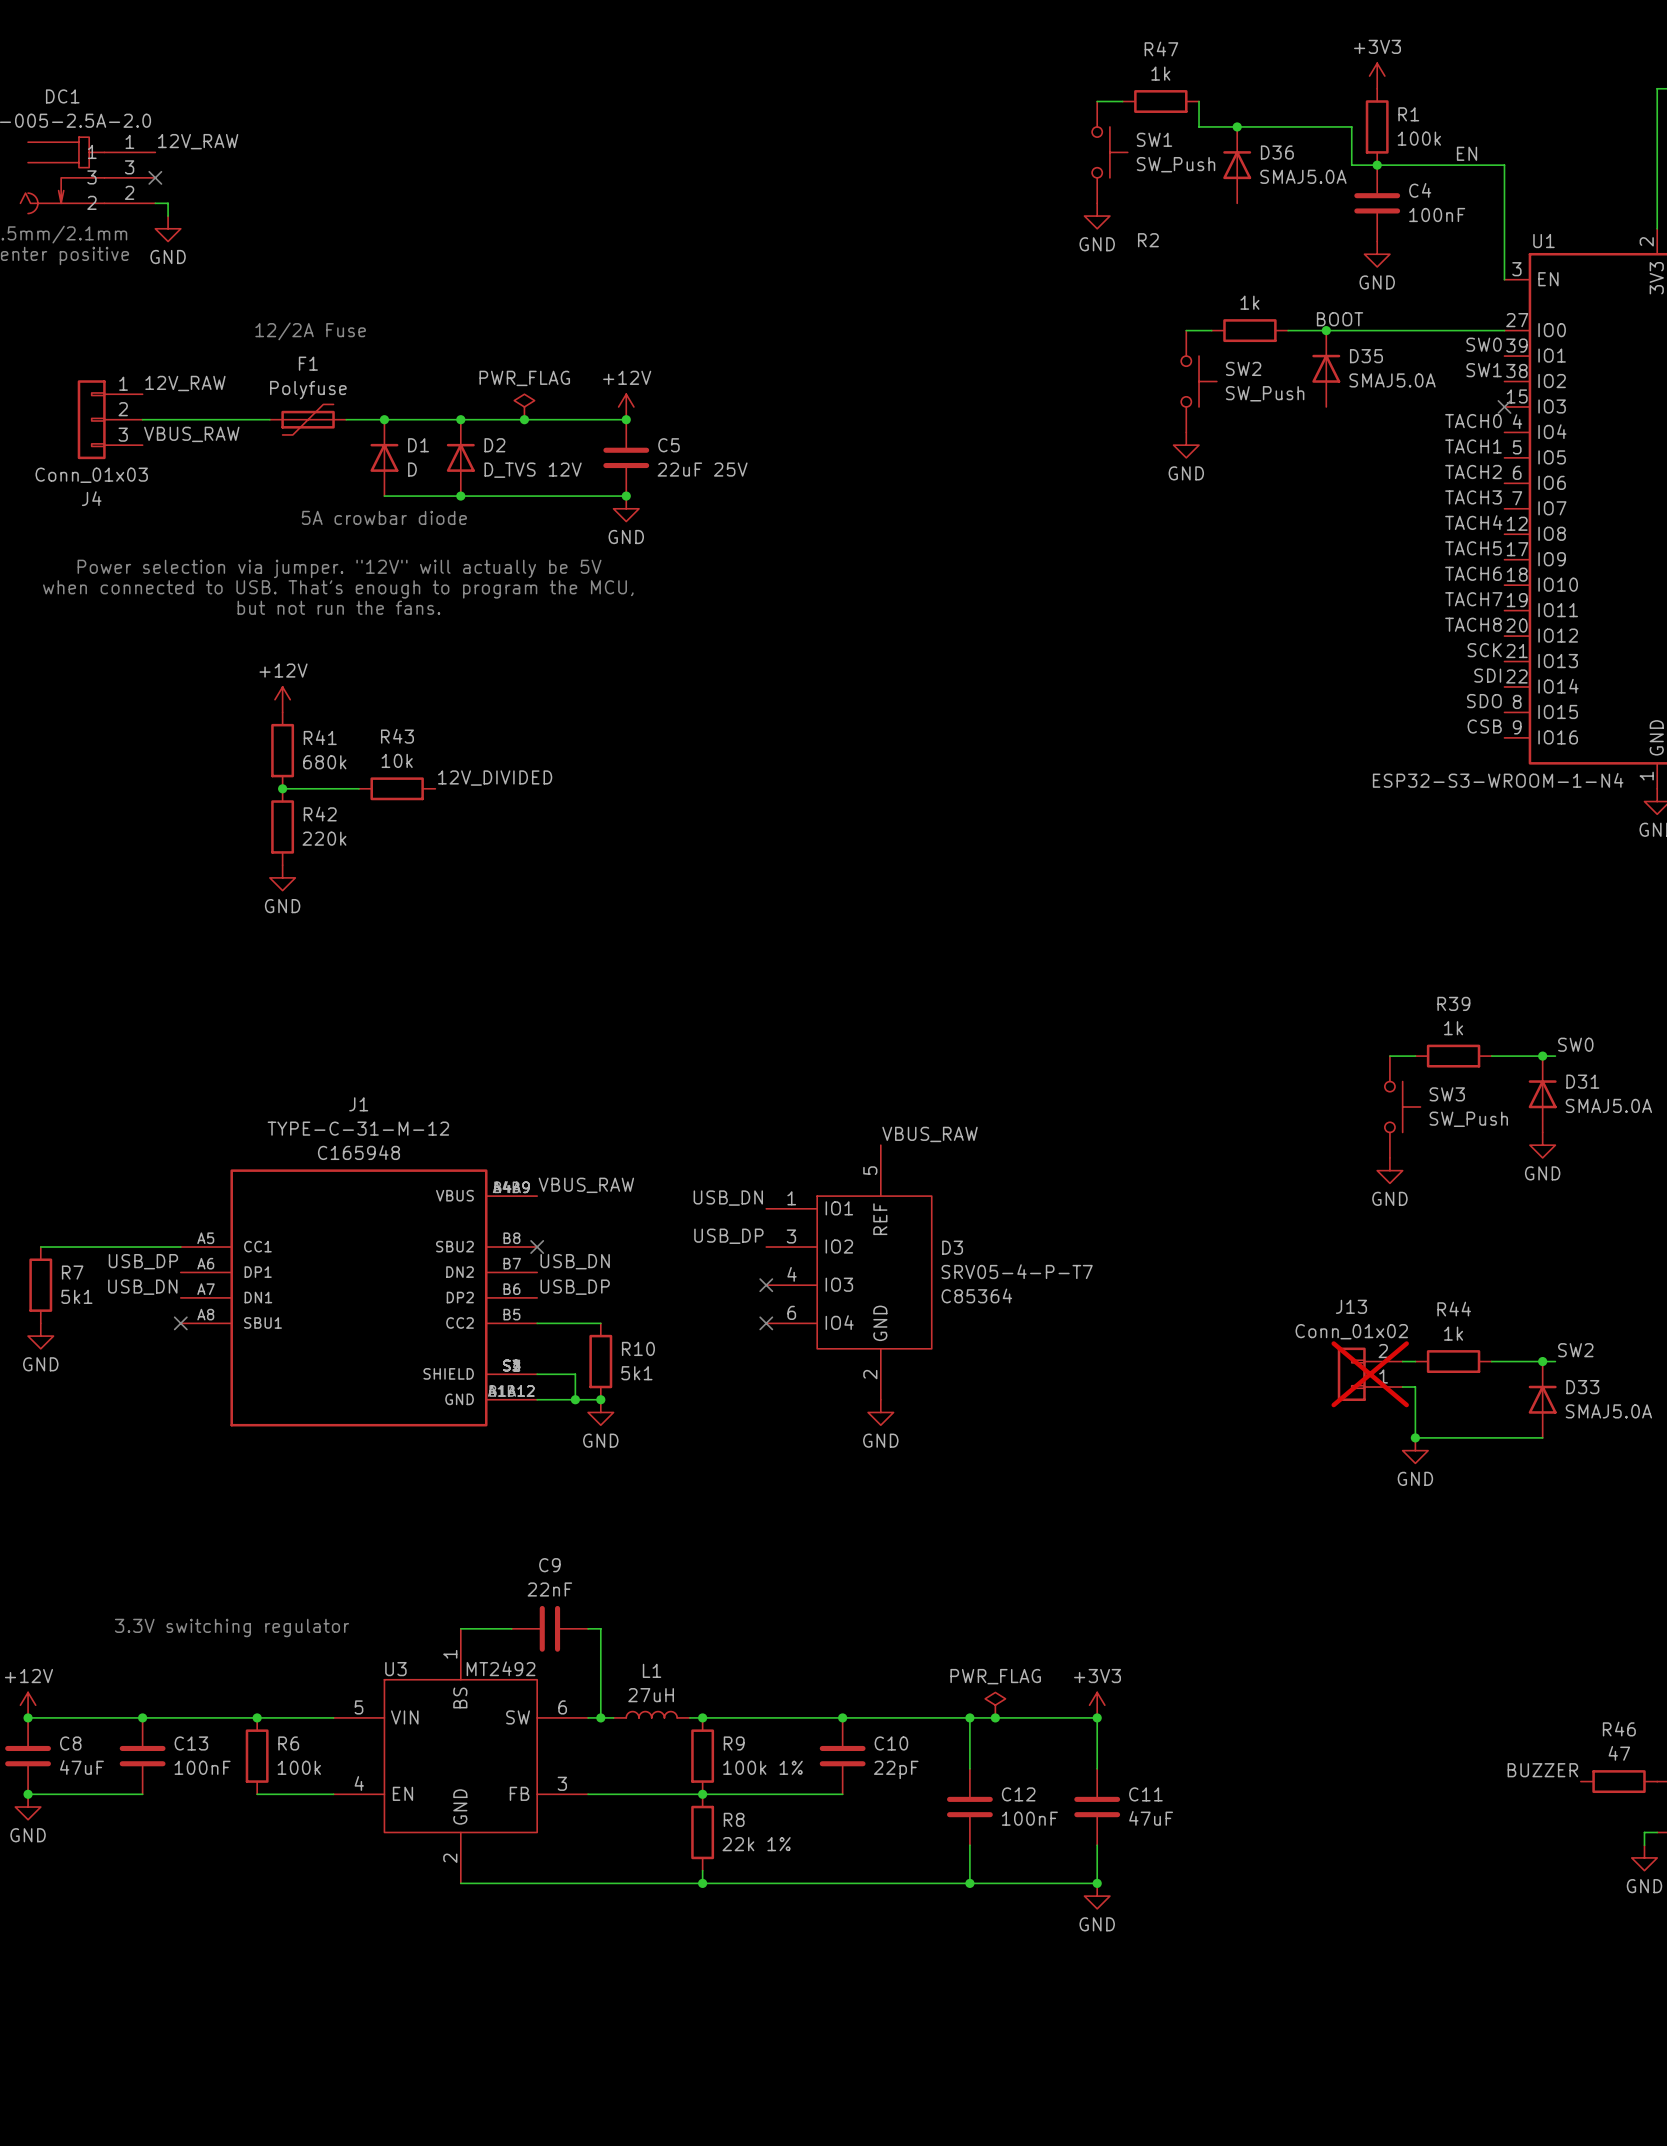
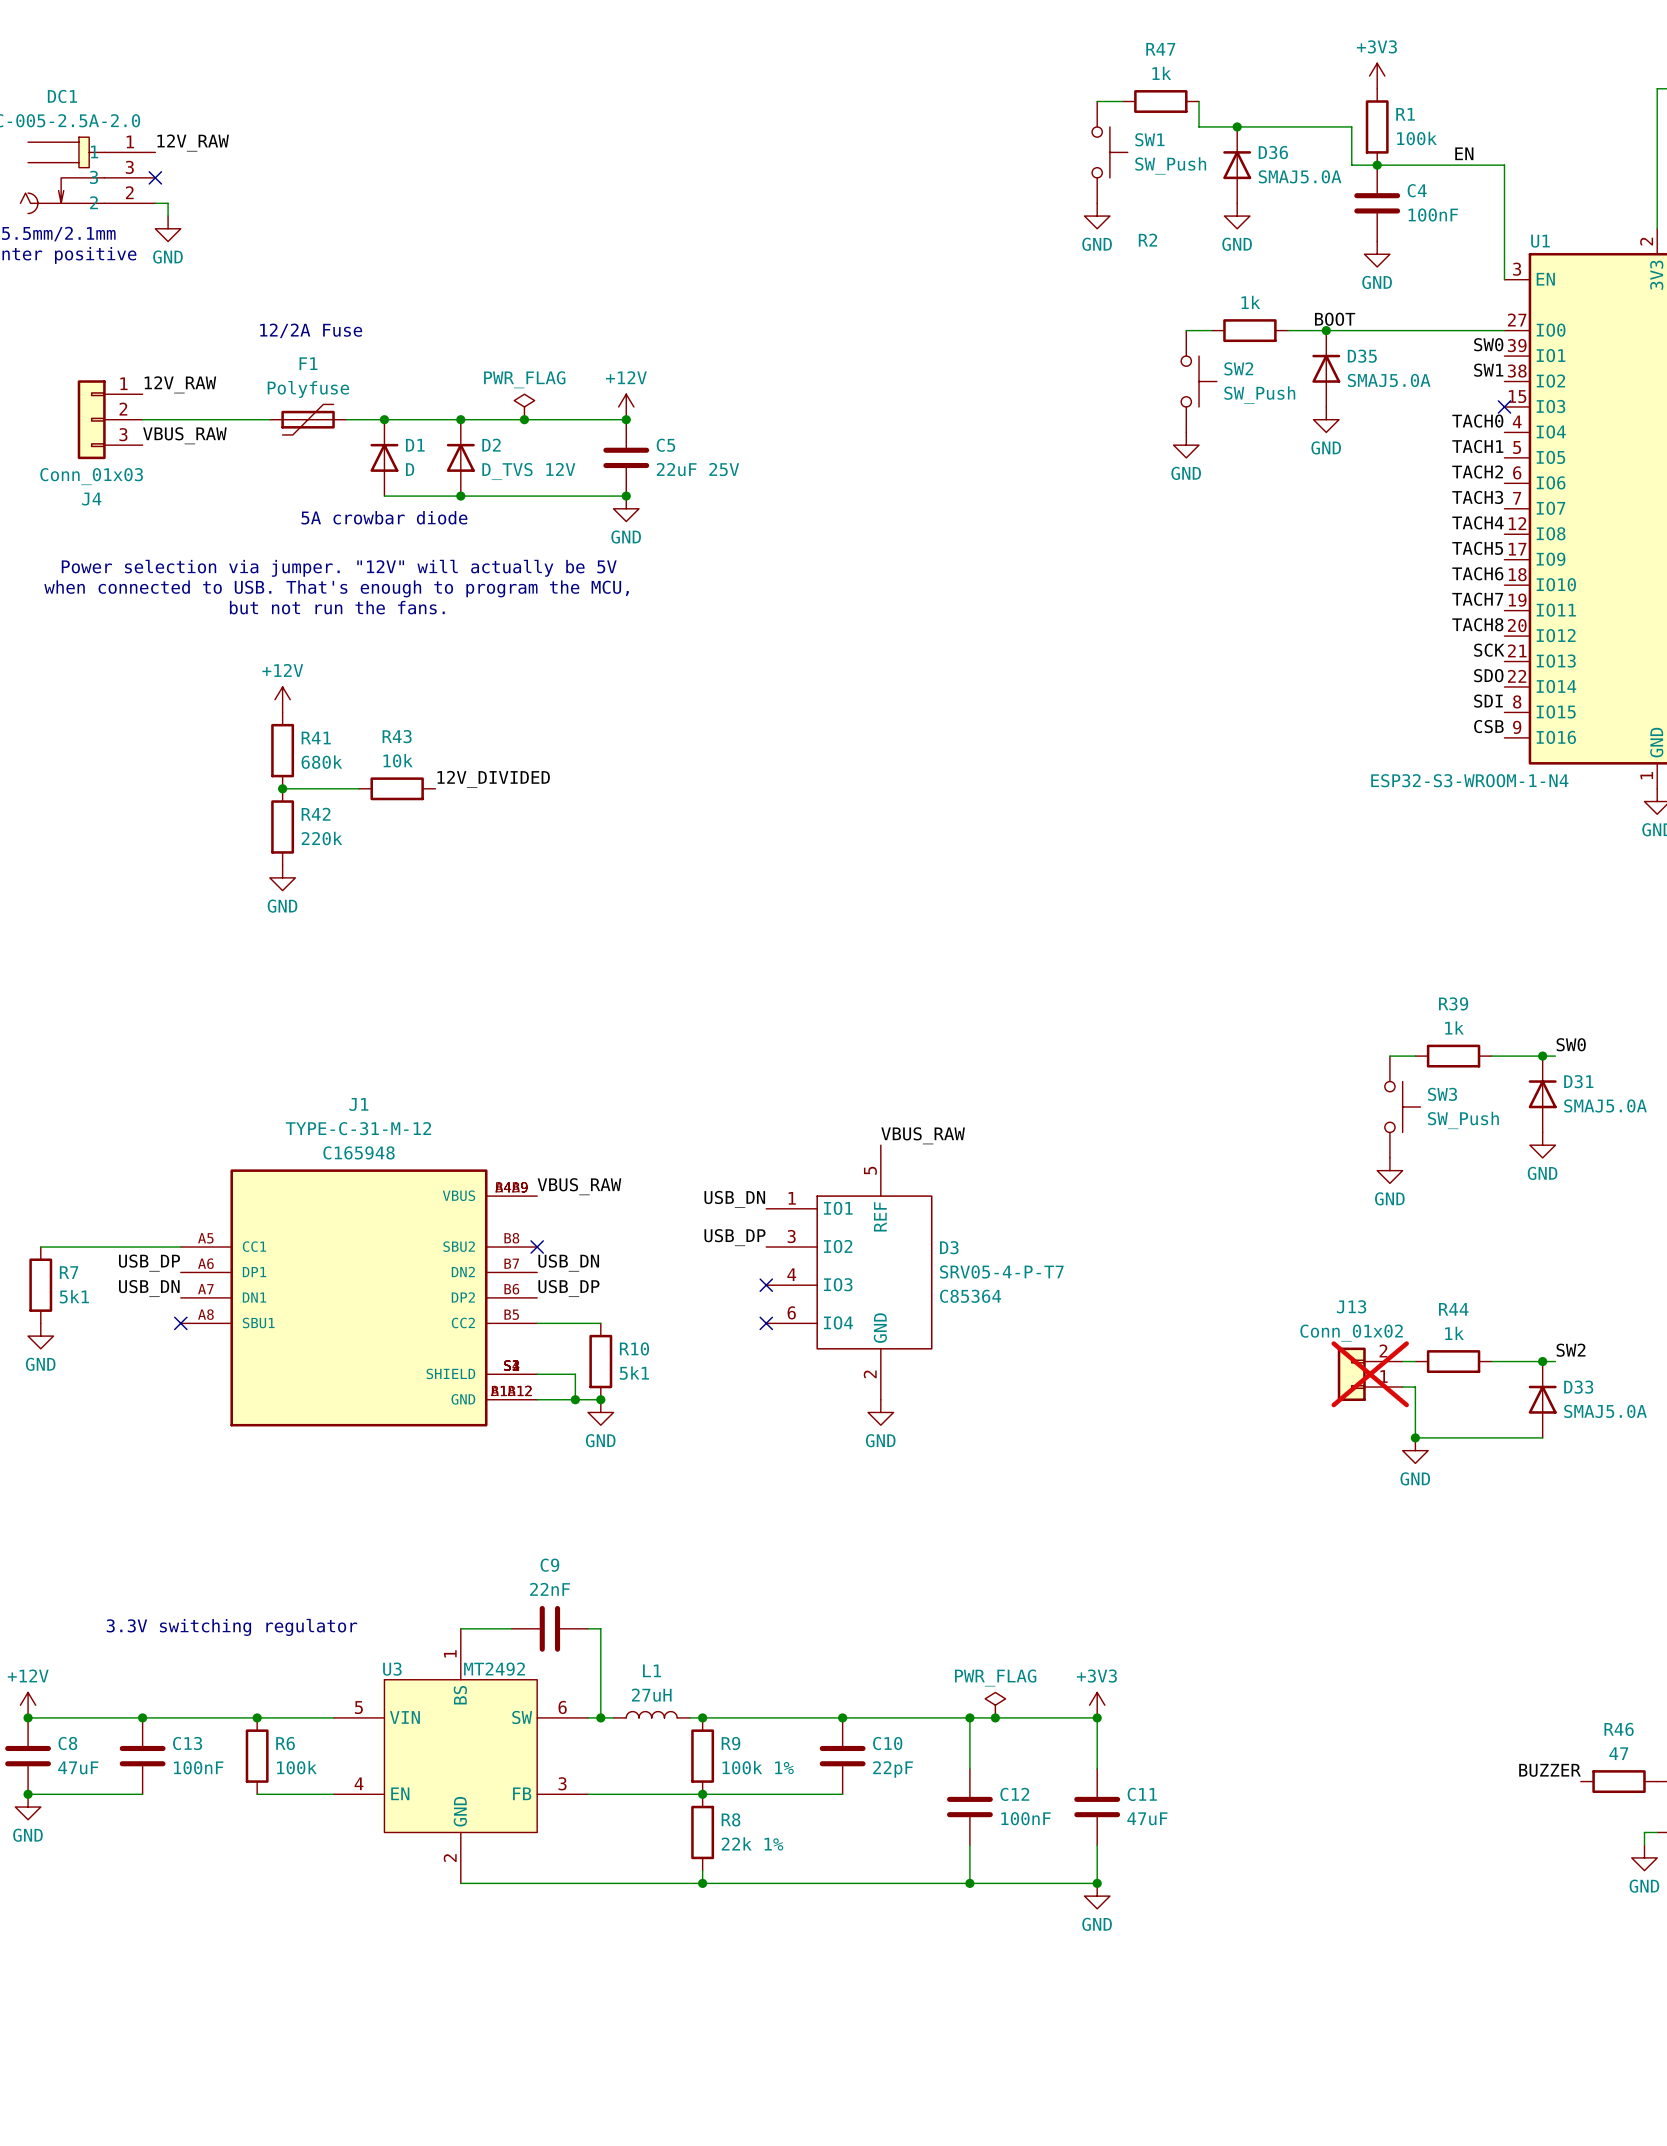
power symbol: none -> GND (1237, 216)
power symbol: none -> GND (1326, 419)
label: SDI (1487, 675) -> SDO (1488, 675)
label: SDO (1484, 701) -> SDI (1488, 701)

